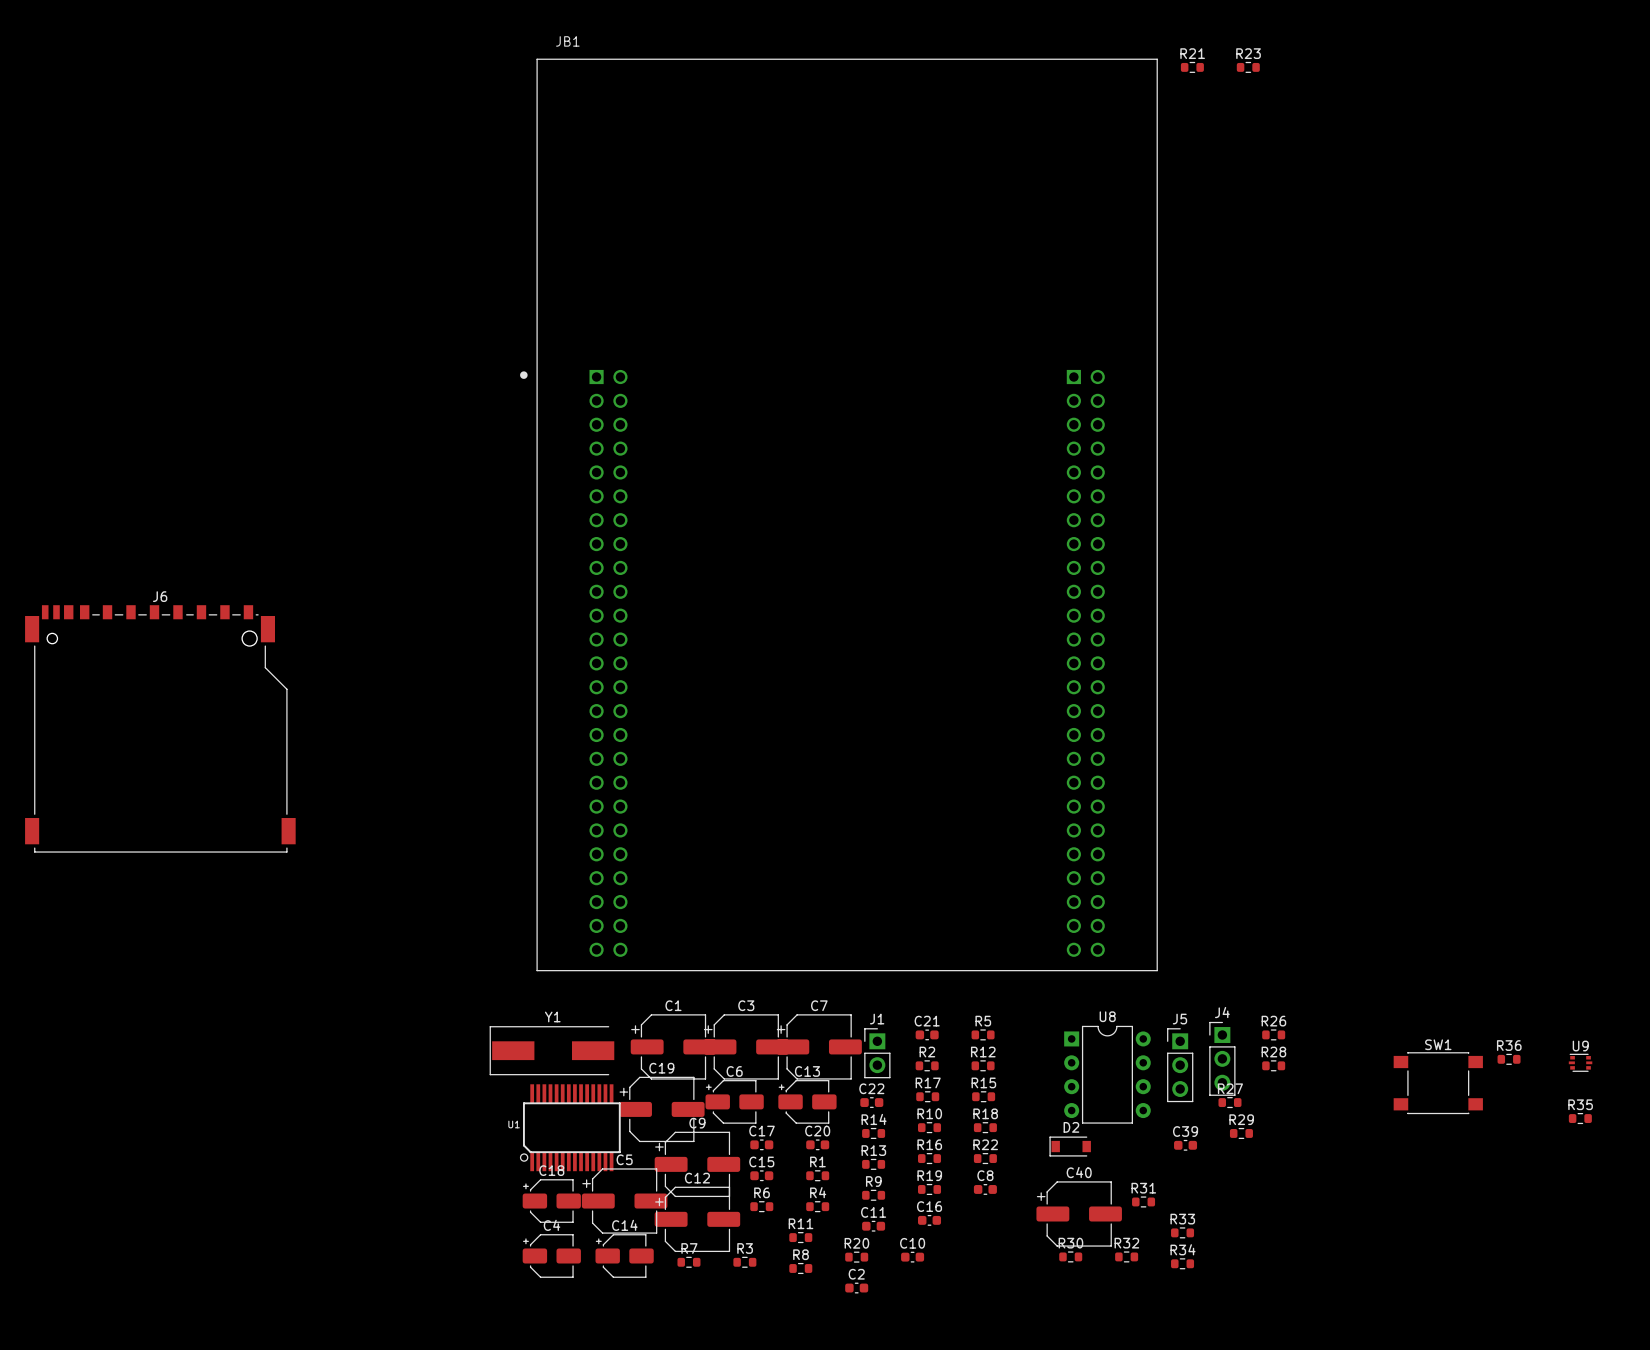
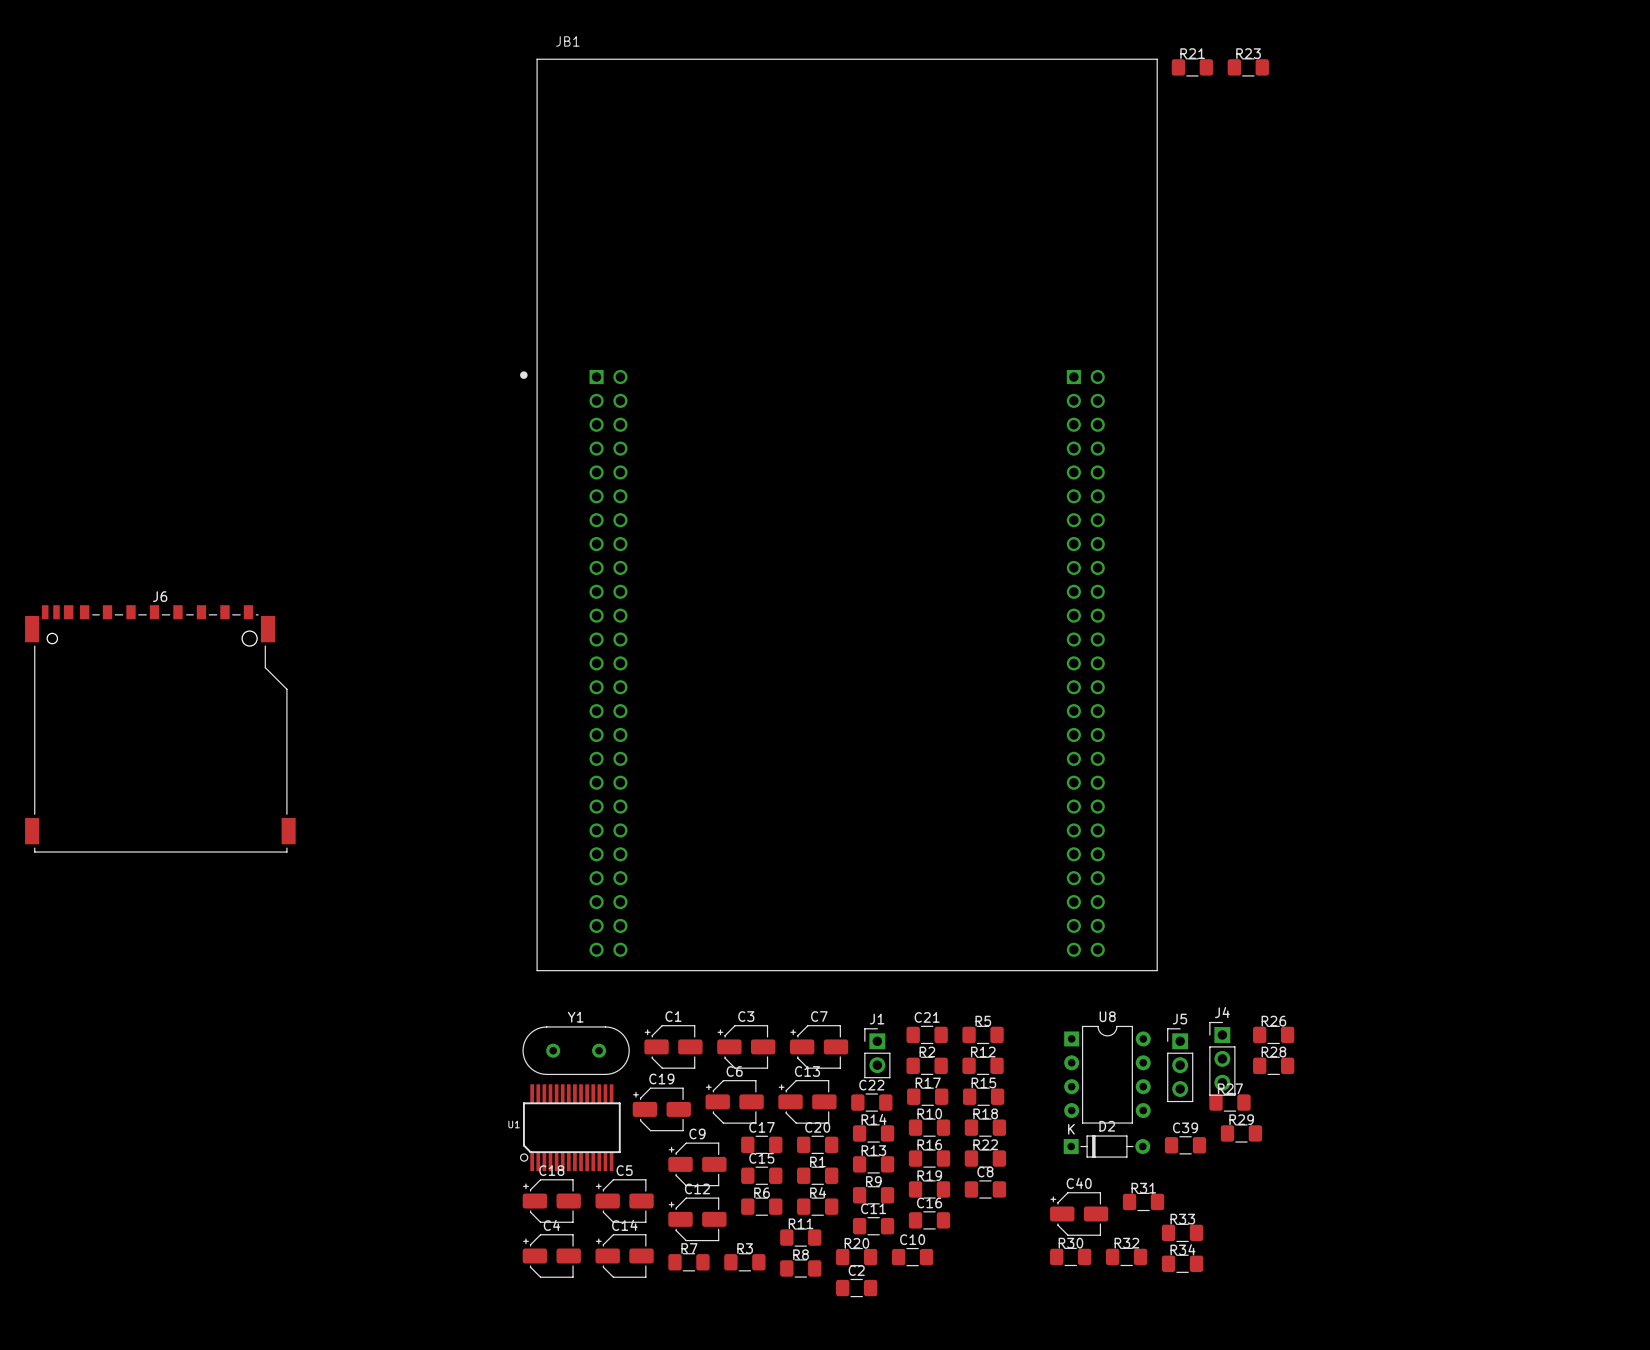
R21 footprint: [1180, 61, 1204, 73] -> [1171, 58, 1214, 77]
R23 footprint: [1236, 61, 1260, 73] -> [1227, 58, 1269, 77]
C1 footprint: [630, 1014, 717, 1080] -> [644, 1025, 703, 1069]
C3 footprint: [703, 1014, 790, 1080] -> [717, 1025, 776, 1069]
C7 footprint: [776, 1014, 862, 1080] -> [789, 1025, 849, 1069]
Y1 footprint: [489, 1026, 615, 1076] -> [522, 1026, 630, 1075]
C21 footprint: [915, 1029, 939, 1041] -> [906, 1025, 948, 1045]
R5 footprint: [971, 1029, 995, 1041] -> [962, 1025, 1004, 1045]
R26 footprint: [1262, 1029, 1286, 1041] -> [1253, 1025, 1295, 1045]
R36: (1509, 1059) -> none
R2 footprint: [915, 1060, 939, 1072] -> [906, 1056, 948, 1075]
R12 footprint: [971, 1060, 995, 1072] -> [962, 1056, 1004, 1075]
R28 footprint: [1262, 1060, 1286, 1072] -> [1253, 1056, 1295, 1075]
U9: (1580, 1062) -> none
C19 footprint: [619, 1076, 705, 1143] -> [632, 1087, 691, 1132]
SW1: (1438, 1083) -> none
R17 footprint: [916, 1091, 940, 1103] -> [907, 1087, 949, 1106]
R15 footprint: [972, 1091, 996, 1103] -> [962, 1087, 1005, 1106]
C22 footprint: [860, 1097, 884, 1108] -> [851, 1093, 893, 1112]
R27 footprint: [1218, 1097, 1242, 1109] -> [1209, 1093, 1251, 1112]
R35: (1580, 1118) -> none
R10 footprint: [918, 1122, 942, 1134] -> [908, 1118, 951, 1137]
R18 footprint: [973, 1122, 997, 1134] -> [964, 1118, 1007, 1137]
R14 footprint: [862, 1127, 886, 1139] -> [852, 1124, 895, 1143]
R29 footprint: [1229, 1127, 1253, 1139] -> [1220, 1124, 1263, 1143]
C9 footprint: [654, 1131, 741, 1197] -> [668, 1142, 727, 1187]
D2 footprint: [1049, 1136, 1091, 1157] -> [1063, 1135, 1151, 1158]
C17 footprint: [750, 1139, 774, 1151] -> [741, 1135, 783, 1154]
C20 footprint: [806, 1139, 830, 1151] -> [797, 1135, 839, 1154]
C39 footprint: [1174, 1139, 1198, 1151] -> [1164, 1136, 1207, 1155]
R16 footprint: [918, 1153, 942, 1165] -> [908, 1149, 951, 1168]
R22 footprint: [973, 1153, 997, 1165] -> [964, 1149, 1007, 1168]
R13 footprint: [862, 1158, 886, 1170] -> [852, 1155, 895, 1174]
C5 footprint: [581, 1168, 668, 1234] -> [595, 1179, 654, 1223]
C15 footprint: [750, 1170, 774, 1182] -> [741, 1166, 783, 1185]
R1 footprint: [806, 1170, 830, 1182] -> [797, 1166, 839, 1185]
C40 footprint: [1036, 1181, 1122, 1247] -> [1050, 1192, 1109, 1236]
R19 footprint: [918, 1183, 942, 1195] -> [908, 1180, 951, 1199]
C8 footprint: [973, 1184, 997, 1195] -> [964, 1180, 1007, 1199]
C12 footprint: [654, 1186, 741, 1252] -> [668, 1197, 727, 1242]
R9 footprint: [862, 1189, 886, 1201] -> [852, 1186, 895, 1205]
R31 footprint: [1132, 1196, 1156, 1208] -> [1122, 1192, 1165, 1212]
R6 footprint: [750, 1201, 774, 1213] -> [741, 1197, 783, 1216]
R4 footprint: [806, 1201, 830, 1213] -> [797, 1197, 839, 1216]
C16 footprint: [918, 1215, 942, 1226] -> [908, 1211, 951, 1230]
C11 footprint: [862, 1220, 886, 1232] -> [852, 1217, 895, 1236]
R33 footprint: [1171, 1227, 1195, 1239] -> [1161, 1223, 1204, 1242]
R11 footprint: [789, 1232, 813, 1244] -> [780, 1228, 822, 1247]
R20 footprint: [845, 1251, 869, 1263] -> [836, 1248, 878, 1267]
C10 footprint: [901, 1251, 925, 1263] -> [891, 1248, 934, 1267]
R30 footprint: [1059, 1251, 1083, 1263] -> [1050, 1247, 1092, 1267]
R32 footprint: [1115, 1251, 1139, 1263] -> [1105, 1247, 1148, 1267]
R7 footprint: [677, 1256, 701, 1268] -> [668, 1253, 710, 1272]
R3 footprint: [733, 1256, 757, 1268] -> [724, 1253, 766, 1272]
R34 footprint: [1171, 1258, 1195, 1270] -> [1161, 1254, 1204, 1273]
R8 footprint: [789, 1263, 813, 1274] -> [780, 1259, 822, 1278]
C2 footprint: [845, 1282, 869, 1294] -> [836, 1278, 878, 1298]

